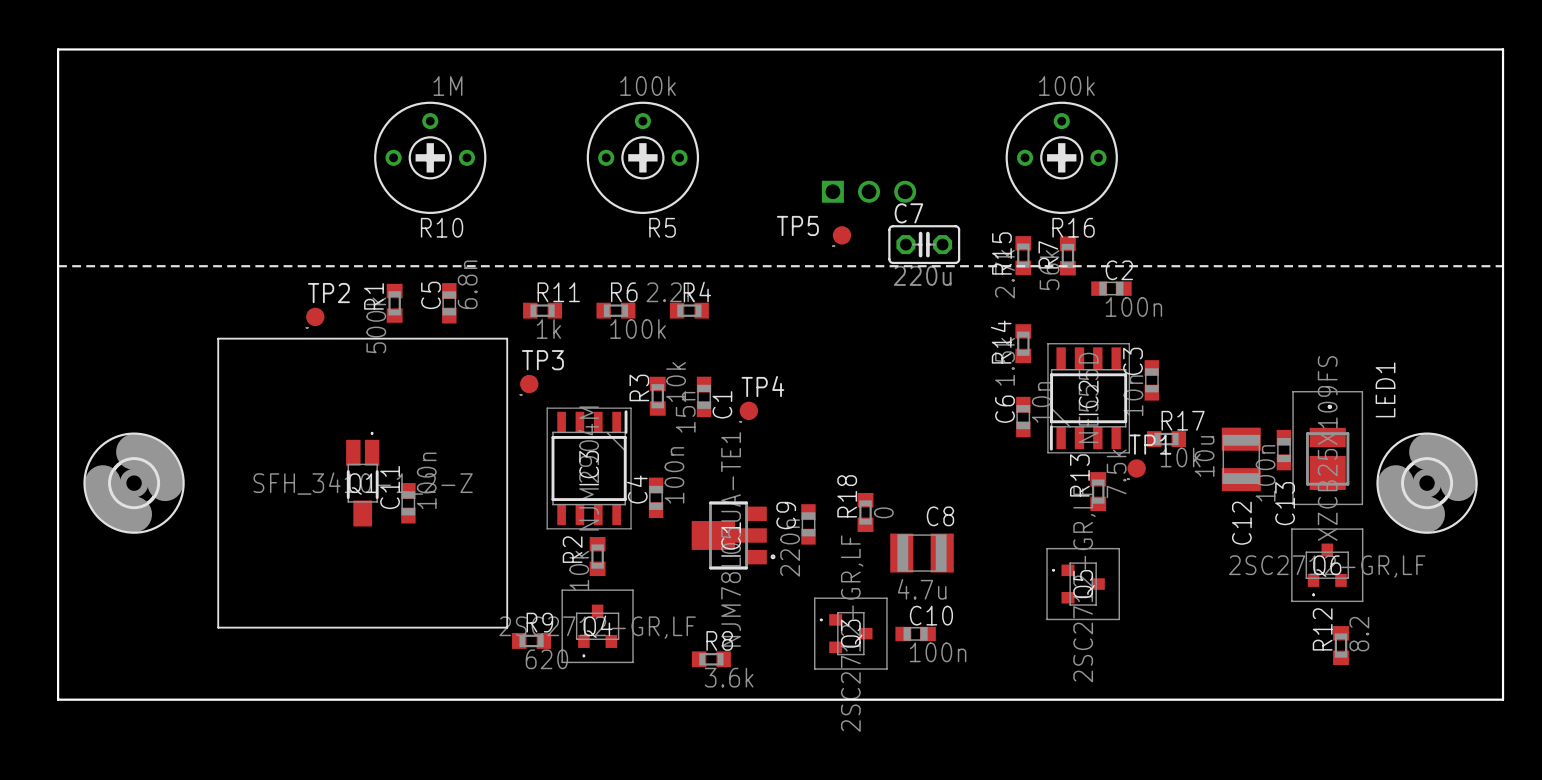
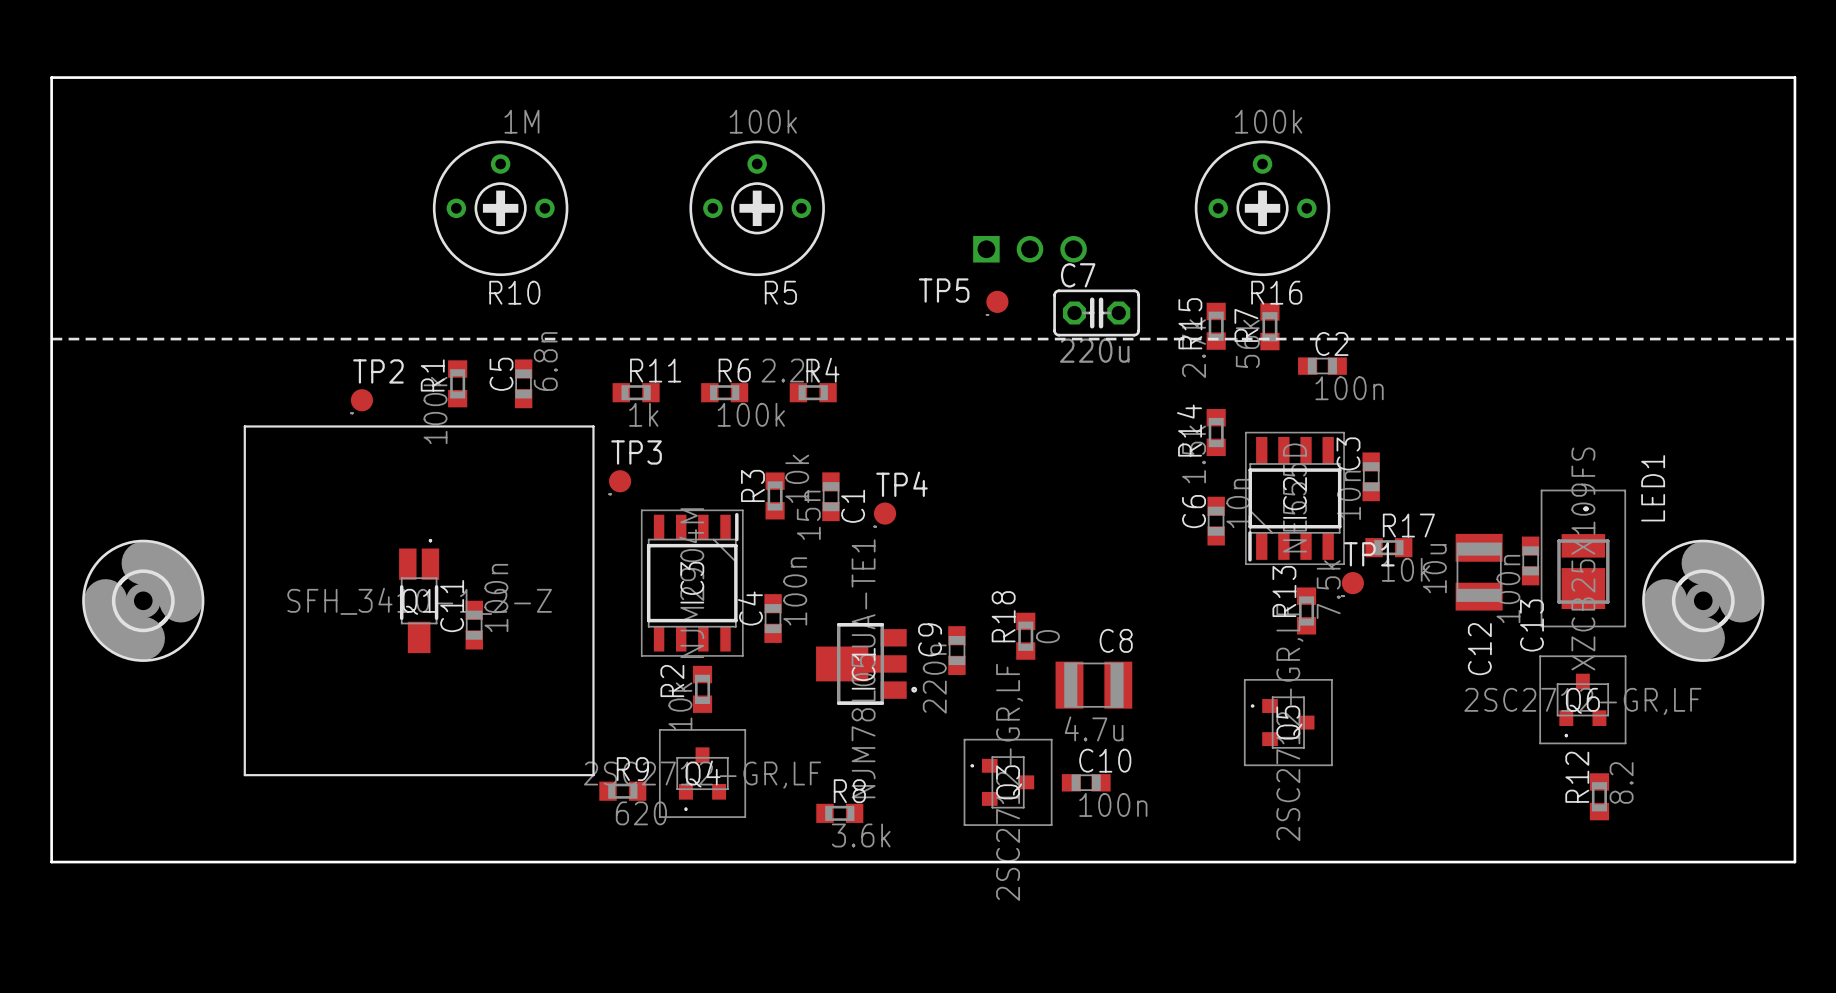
R1 value: 500k (376, 325) -> 100k (435, 410)

